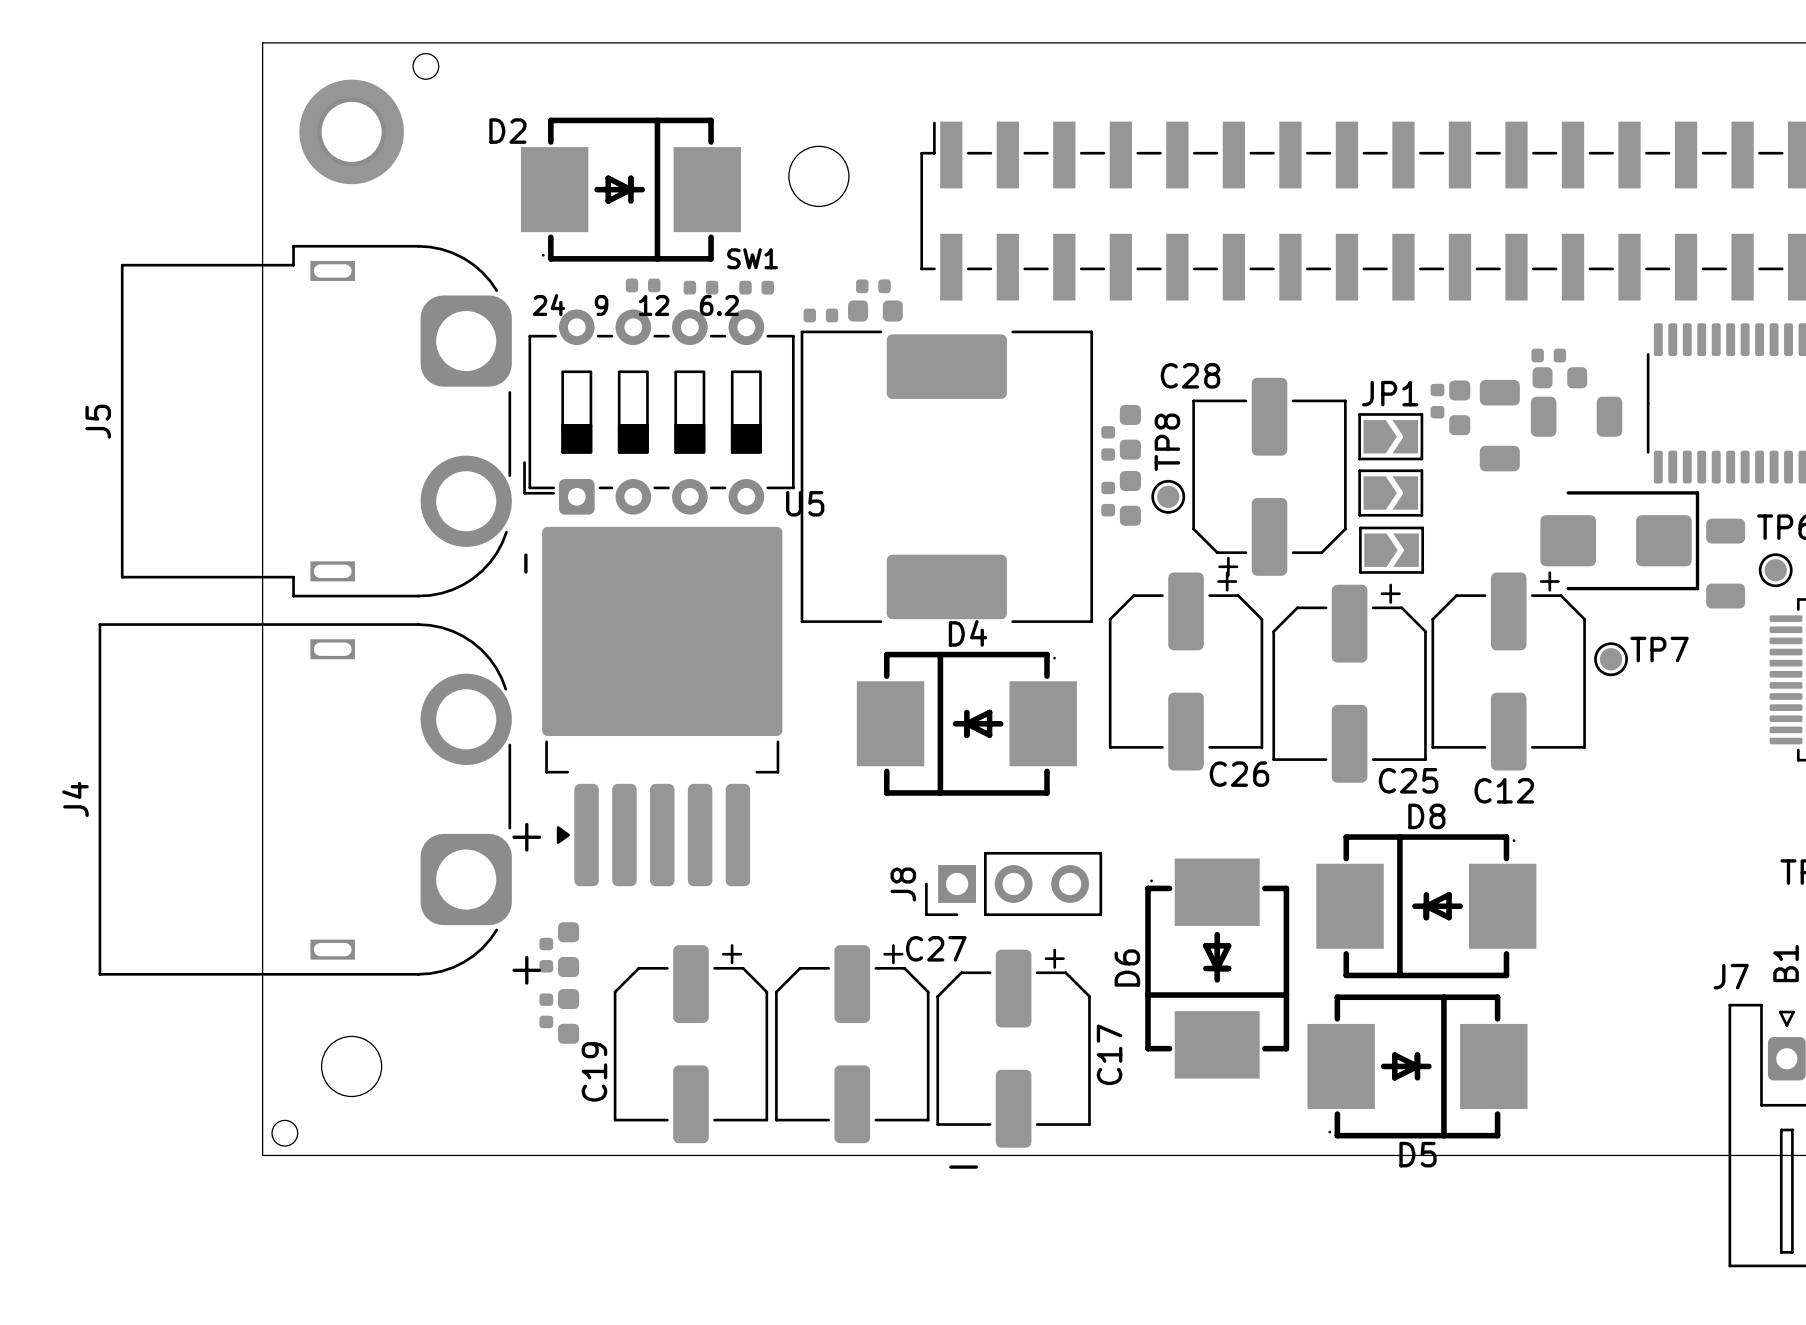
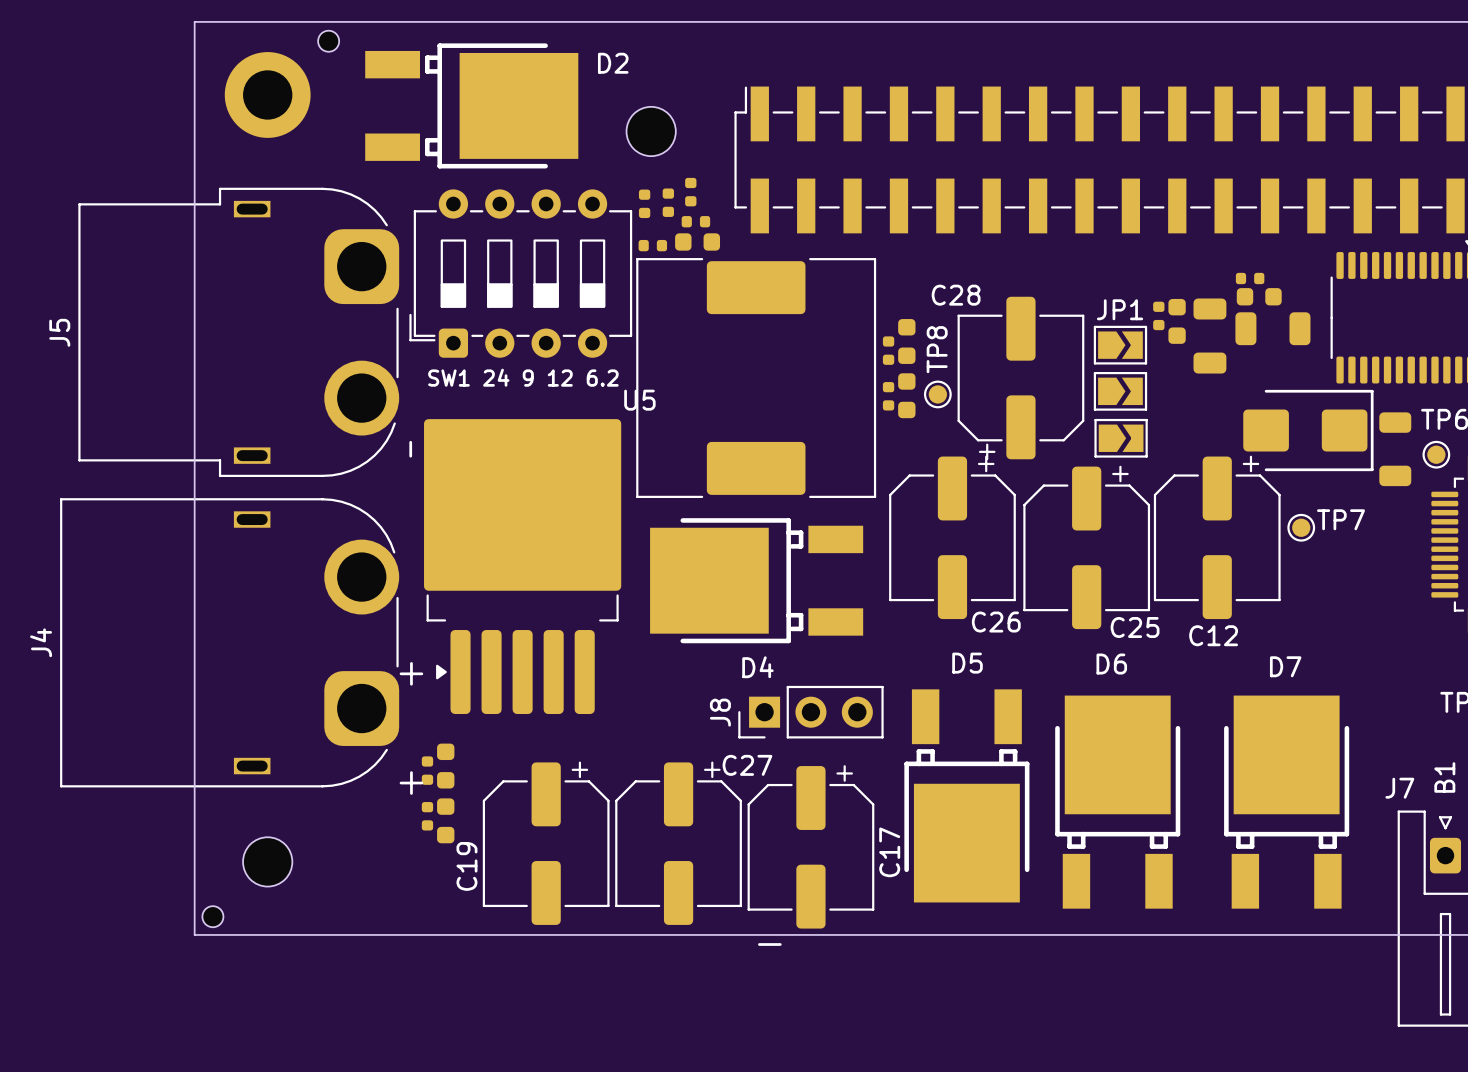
D2 footprint: [520, 117, 741, 262] -> [365, 38, 579, 169]
D2 name position: D2 (507, 131) -> D2 (613, 63)
part: none -> (690, 192)
text: SW1 (752, 258) -> none
part: none -> (668, 202)
part: none -> (644, 203)
part: (643, 285) -> none
part: (700, 287) -> none
part: (756, 287) -> none
text: 24 9 12 6.2 (635, 305) -> none
part position: (658, 412) -> (520, 273)
text: none -> SW1 24 9 12 6.2 (523, 377)
D4 name position: D4 (967, 633) -> D4 (757, 667)
D4 footprint: [856, 651, 1077, 796] -> [650, 518, 864, 649]
D6 footprint: [1145, 858, 1290, 1079] -> [1049, 695, 1181, 909]
D8: (1426, 906) -> none
D6 name position: D6 (1127, 968) -> D6 (1111, 664)
D7: none -> (1284, 802)
D5 footprint: [1307, 994, 1528, 1139] -> [904, 689, 1035, 903]
D5 name position: D5 (1418, 1154) -> D5 (967, 663)

